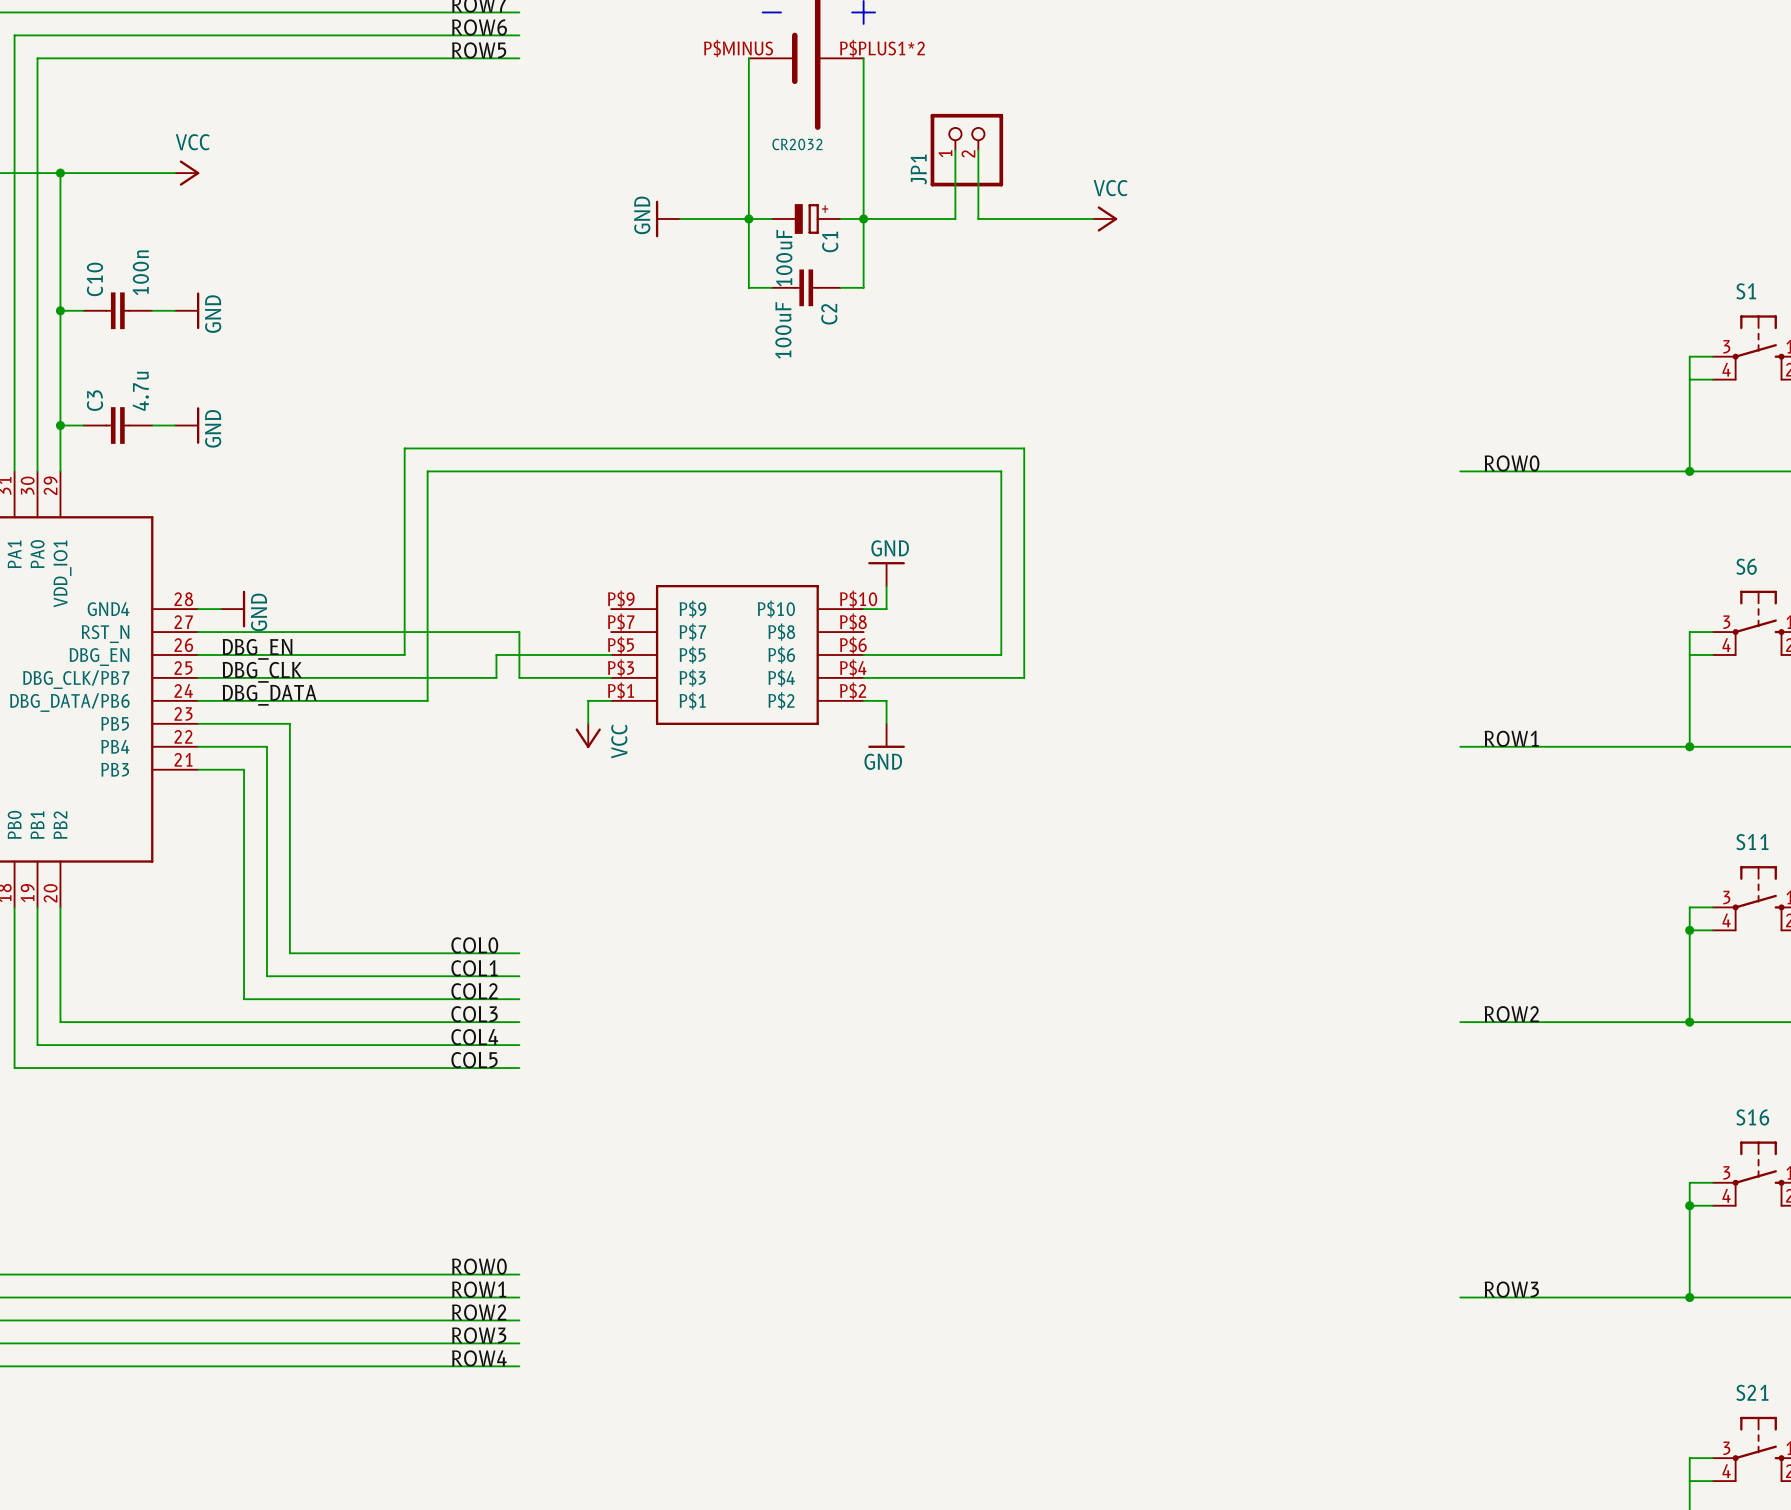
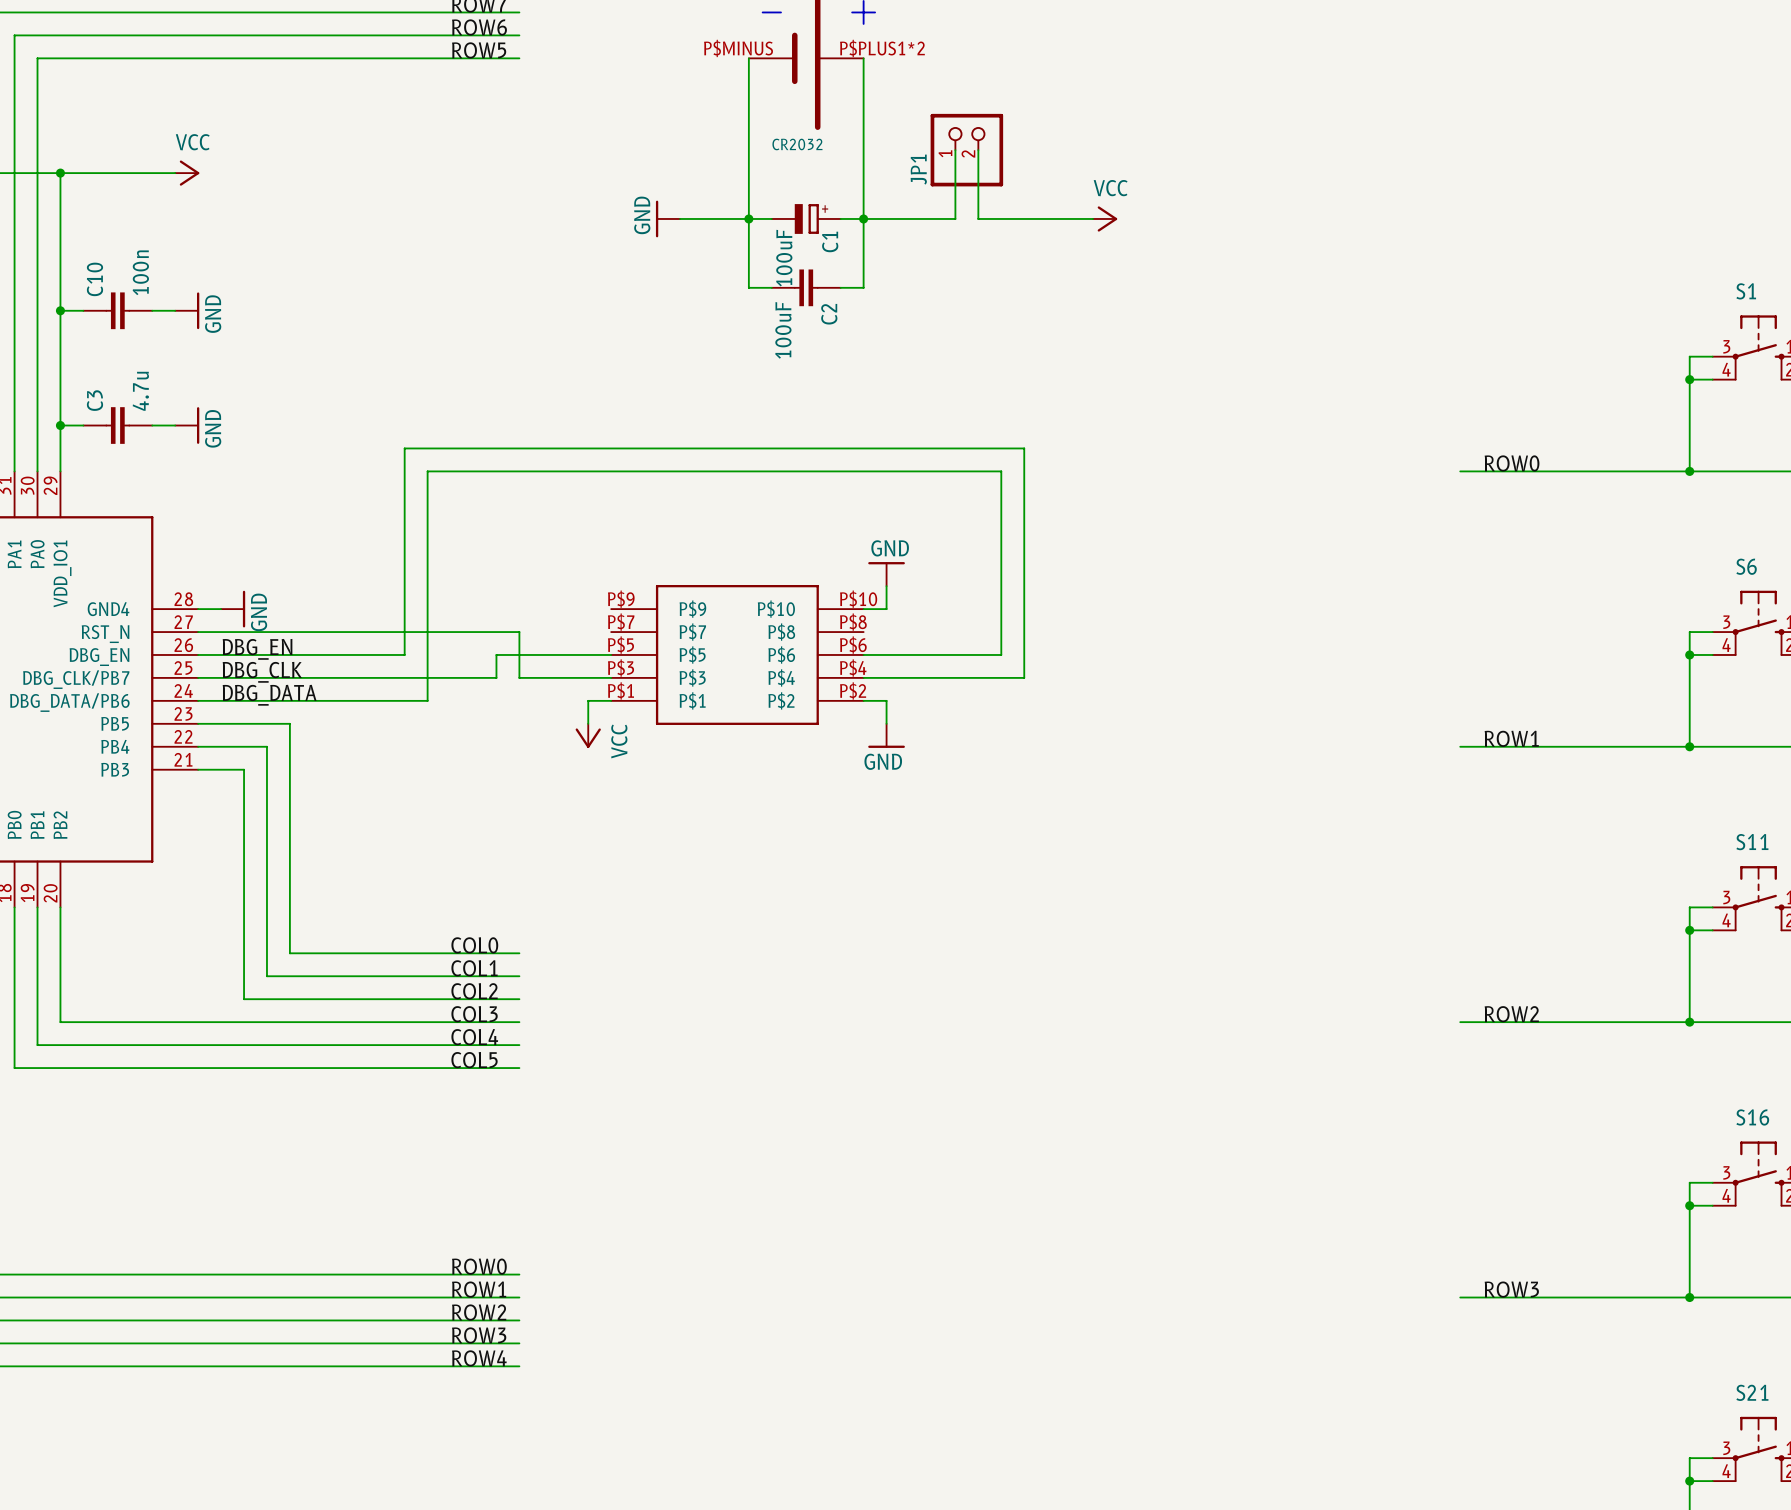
junction: none -> (1689, 379)
junction: none -> (1689, 654)
junction: none -> (1689, 1481)

